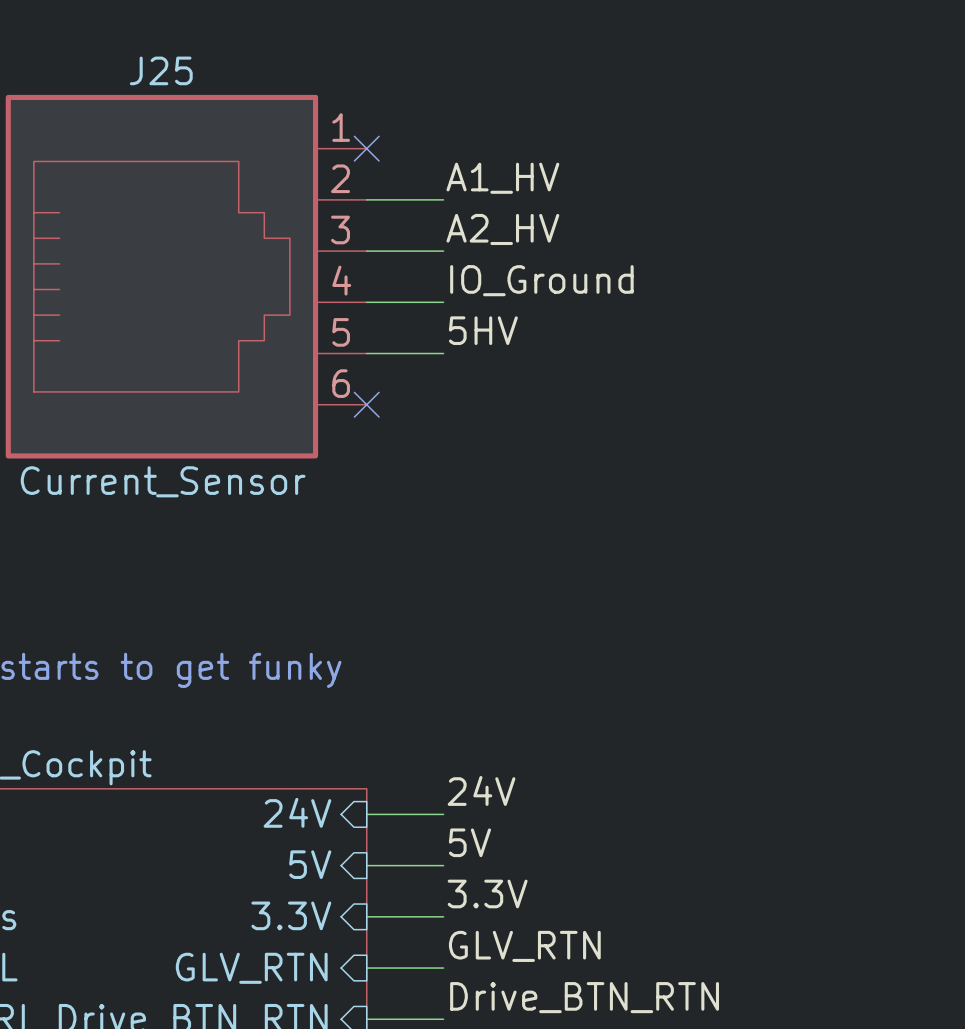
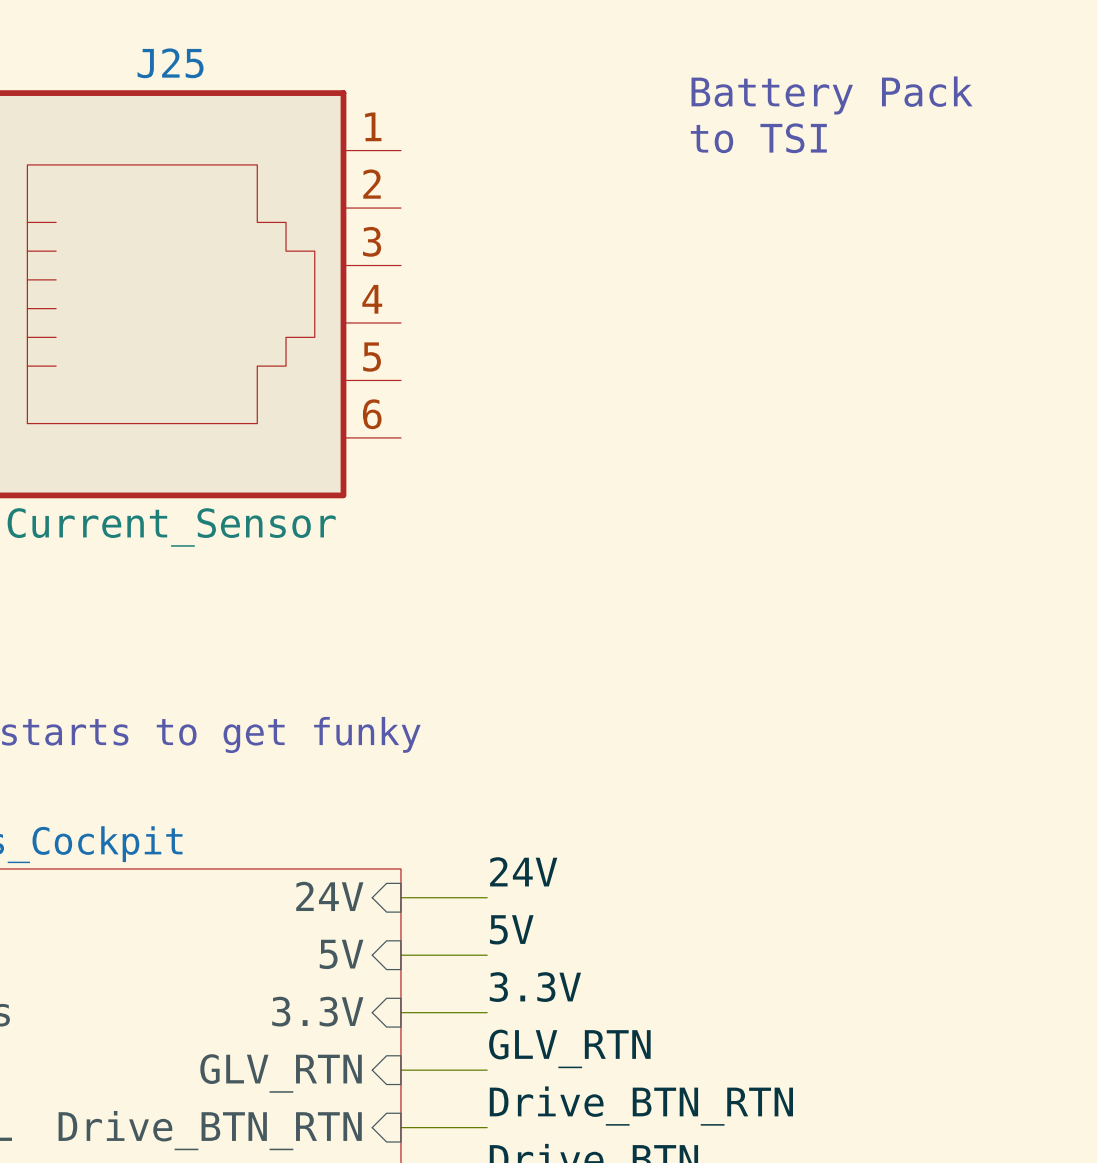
text: none -> Battery Pack (832, 95)
text: none -> to TSI (758, 138)
no-connect mark: (366, 148) -> none
label: A1_HV (502, 178) -> none
wire: (366, 199) (443, 199) -> none
label: A2_HV (502, 229) -> none
wire: (366, 251) (443, 251) -> none
label: IO_Ground (541, 280) -> none
wire: (366, 302) (443, 302) -> none
label: 5HV (483, 330) -> none
wire: (366, 353) (443, 353) -> none
no-connect mark: (366, 404) -> none

